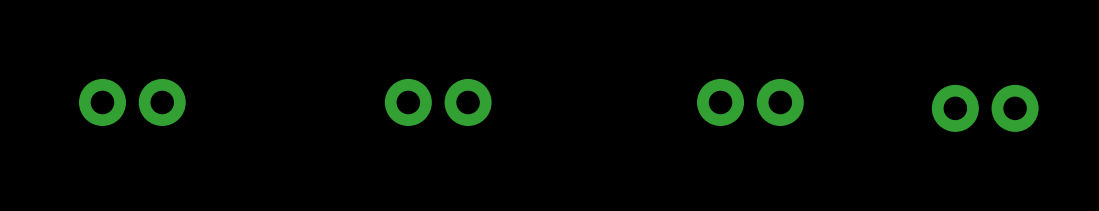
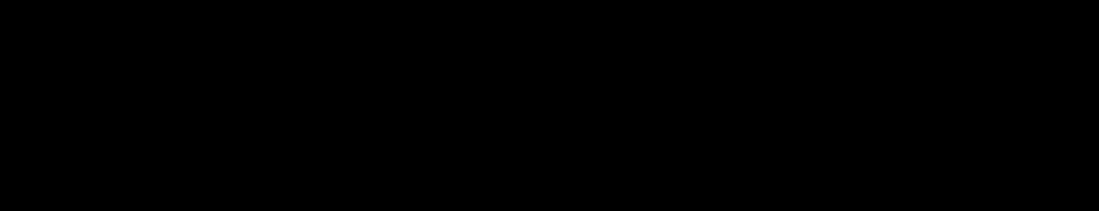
part: (132, 102) -> none
part: (438, 102) -> none
part: (750, 102) -> none
part: (985, 108) -> none

